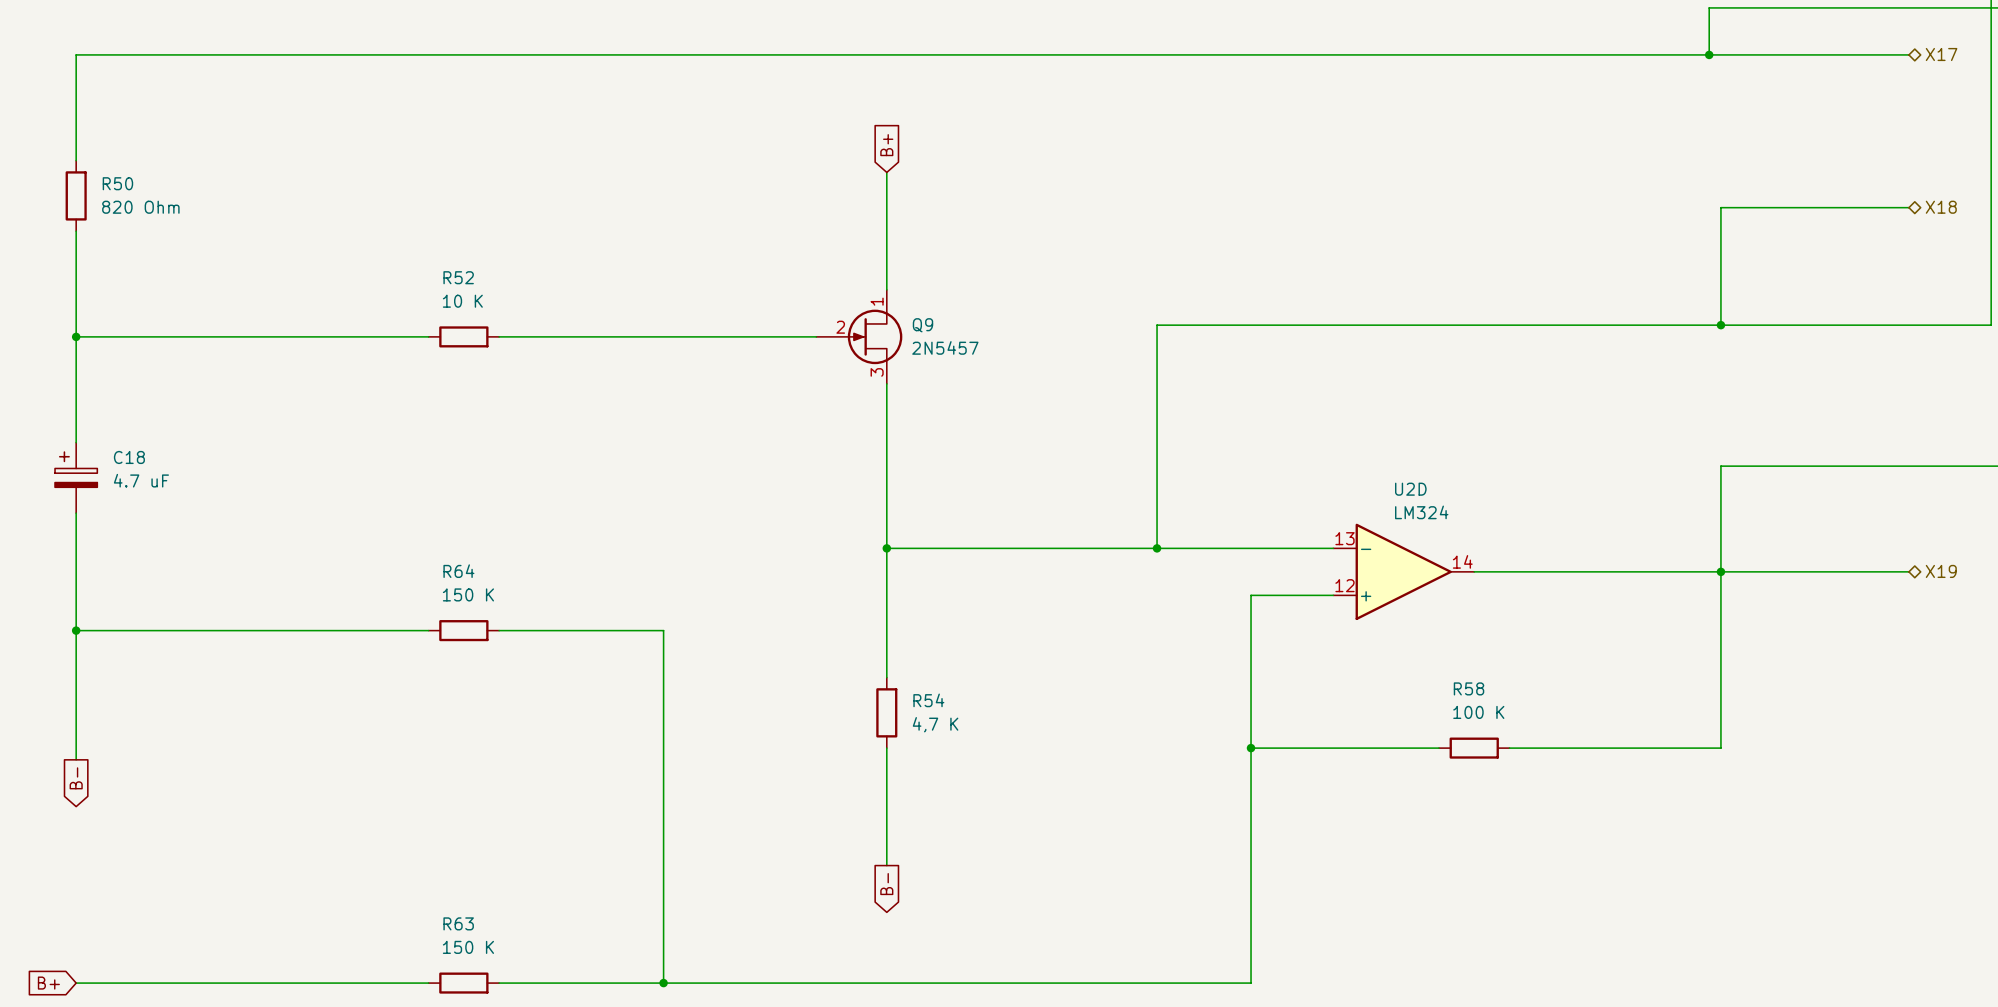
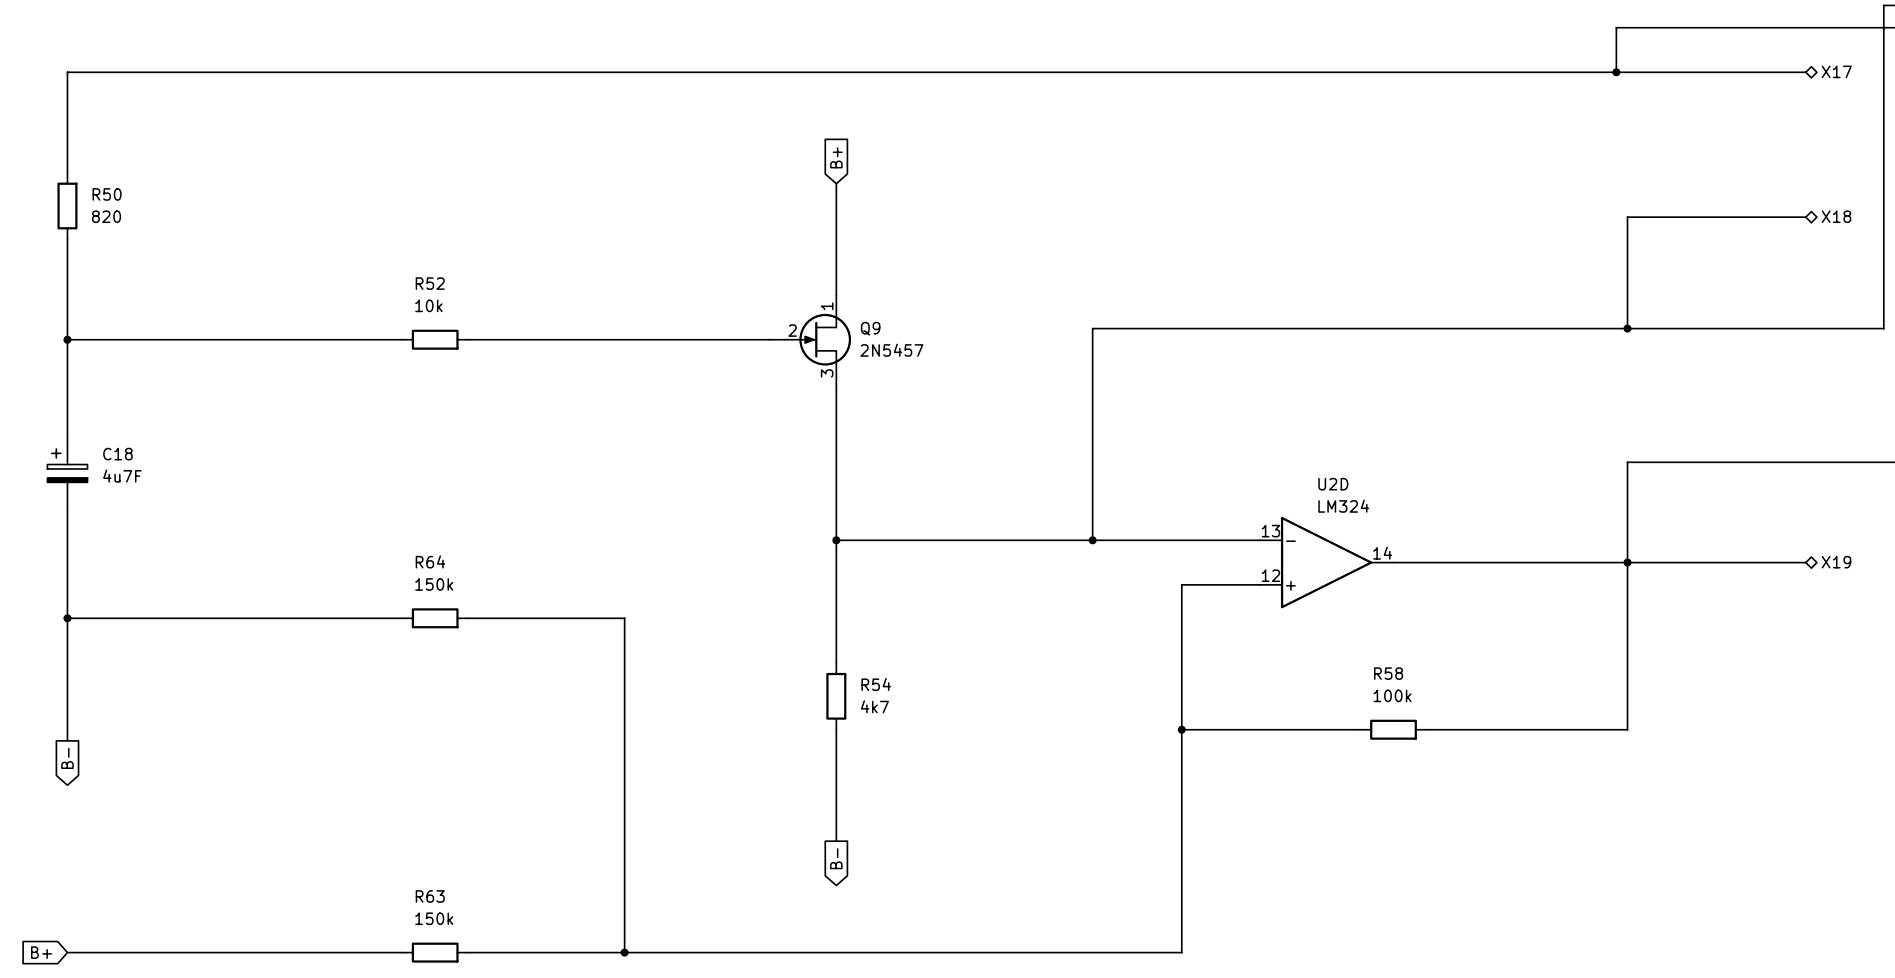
R50 value: 820 Ohm (140, 207) -> 820 (106, 216)
R52 value: 10 K (462, 301) -> 10k (428, 305)
C18 value: 4.7 uF (141, 480) -> 4u7F (122, 476)
R64 value: 150 K (468, 594) -> 150k (434, 584)
R58 value: 100 K (1478, 712) -> 100k (1392, 695)
R54 value: 4,7 K (935, 724) -> 4k7 (874, 706)
R63 value: 150 K (468, 947) -> 150k (434, 918)

